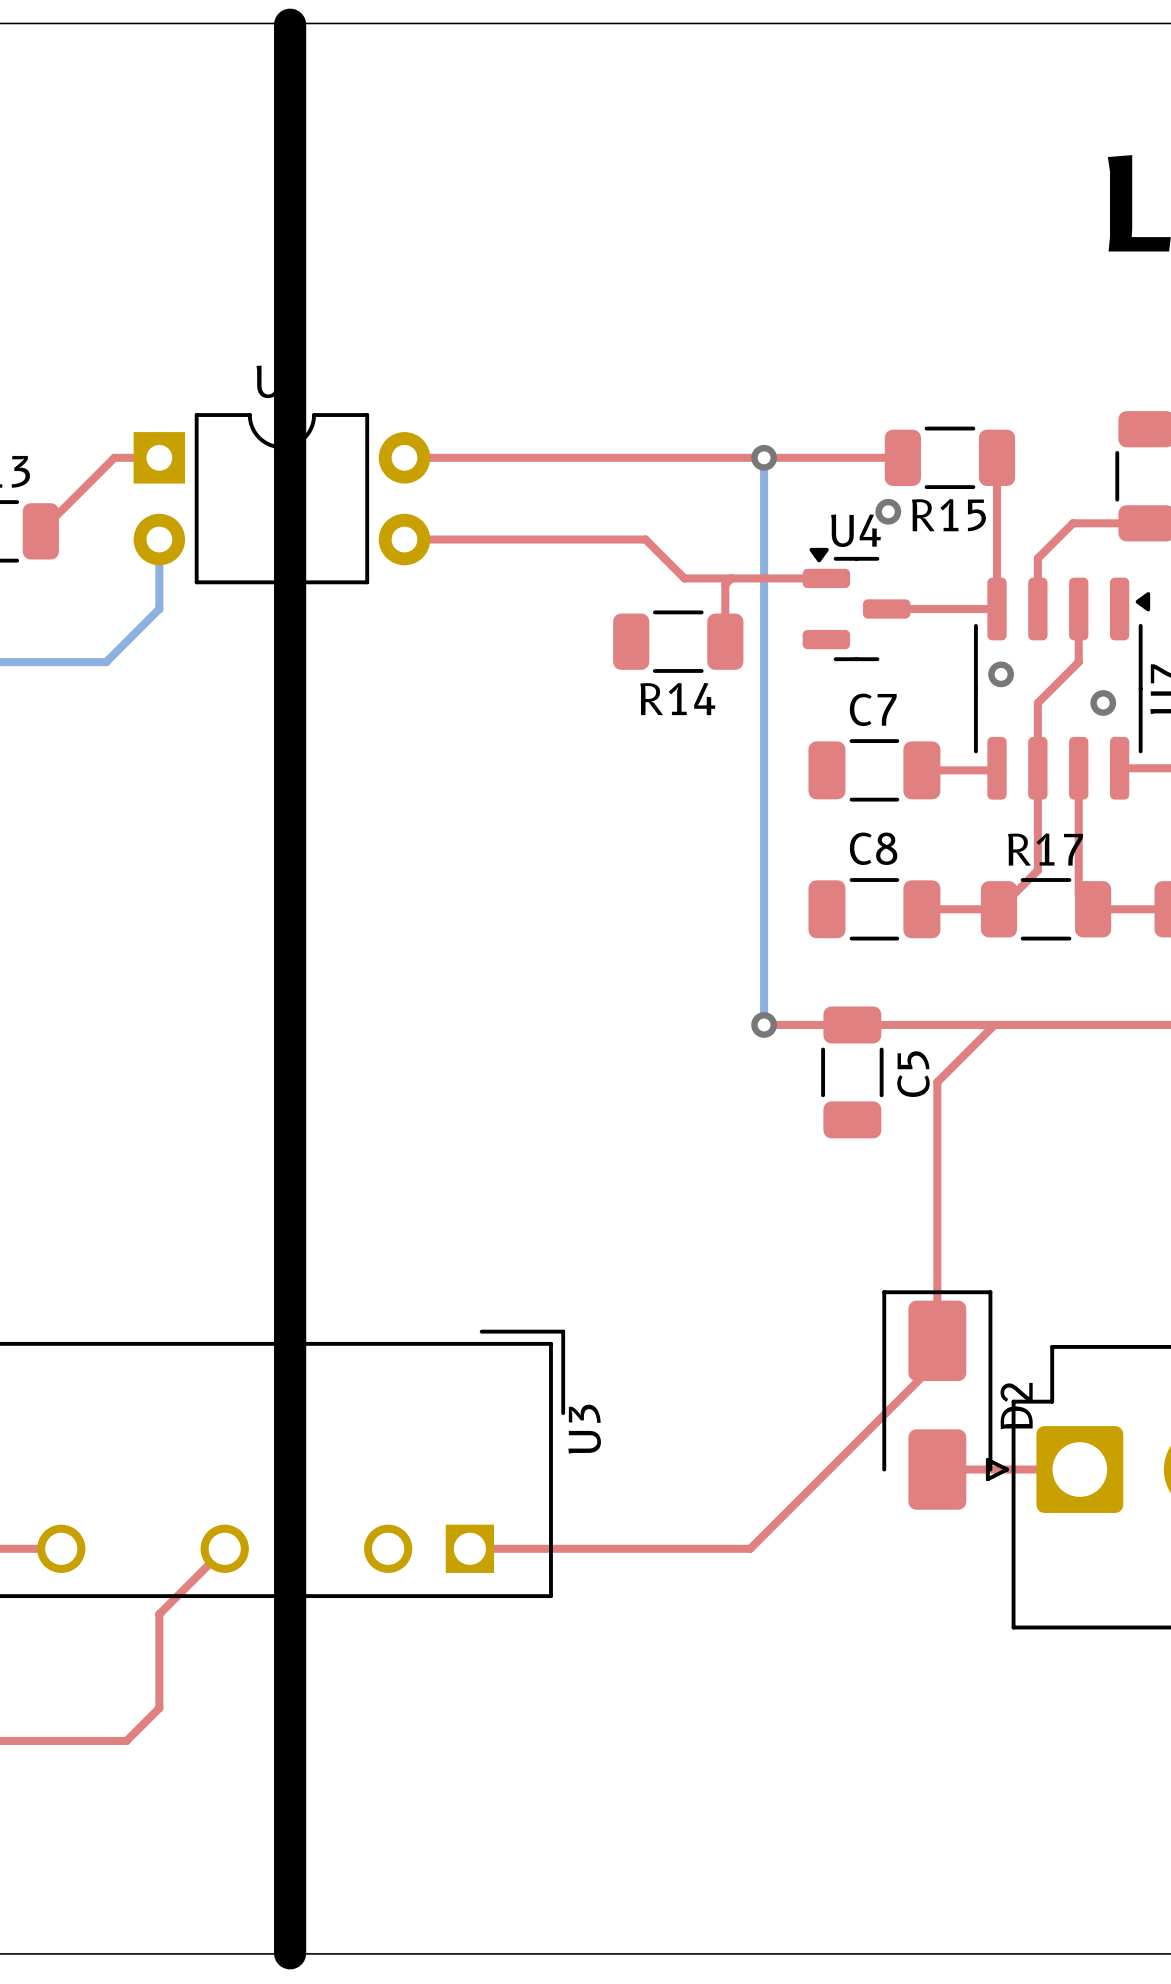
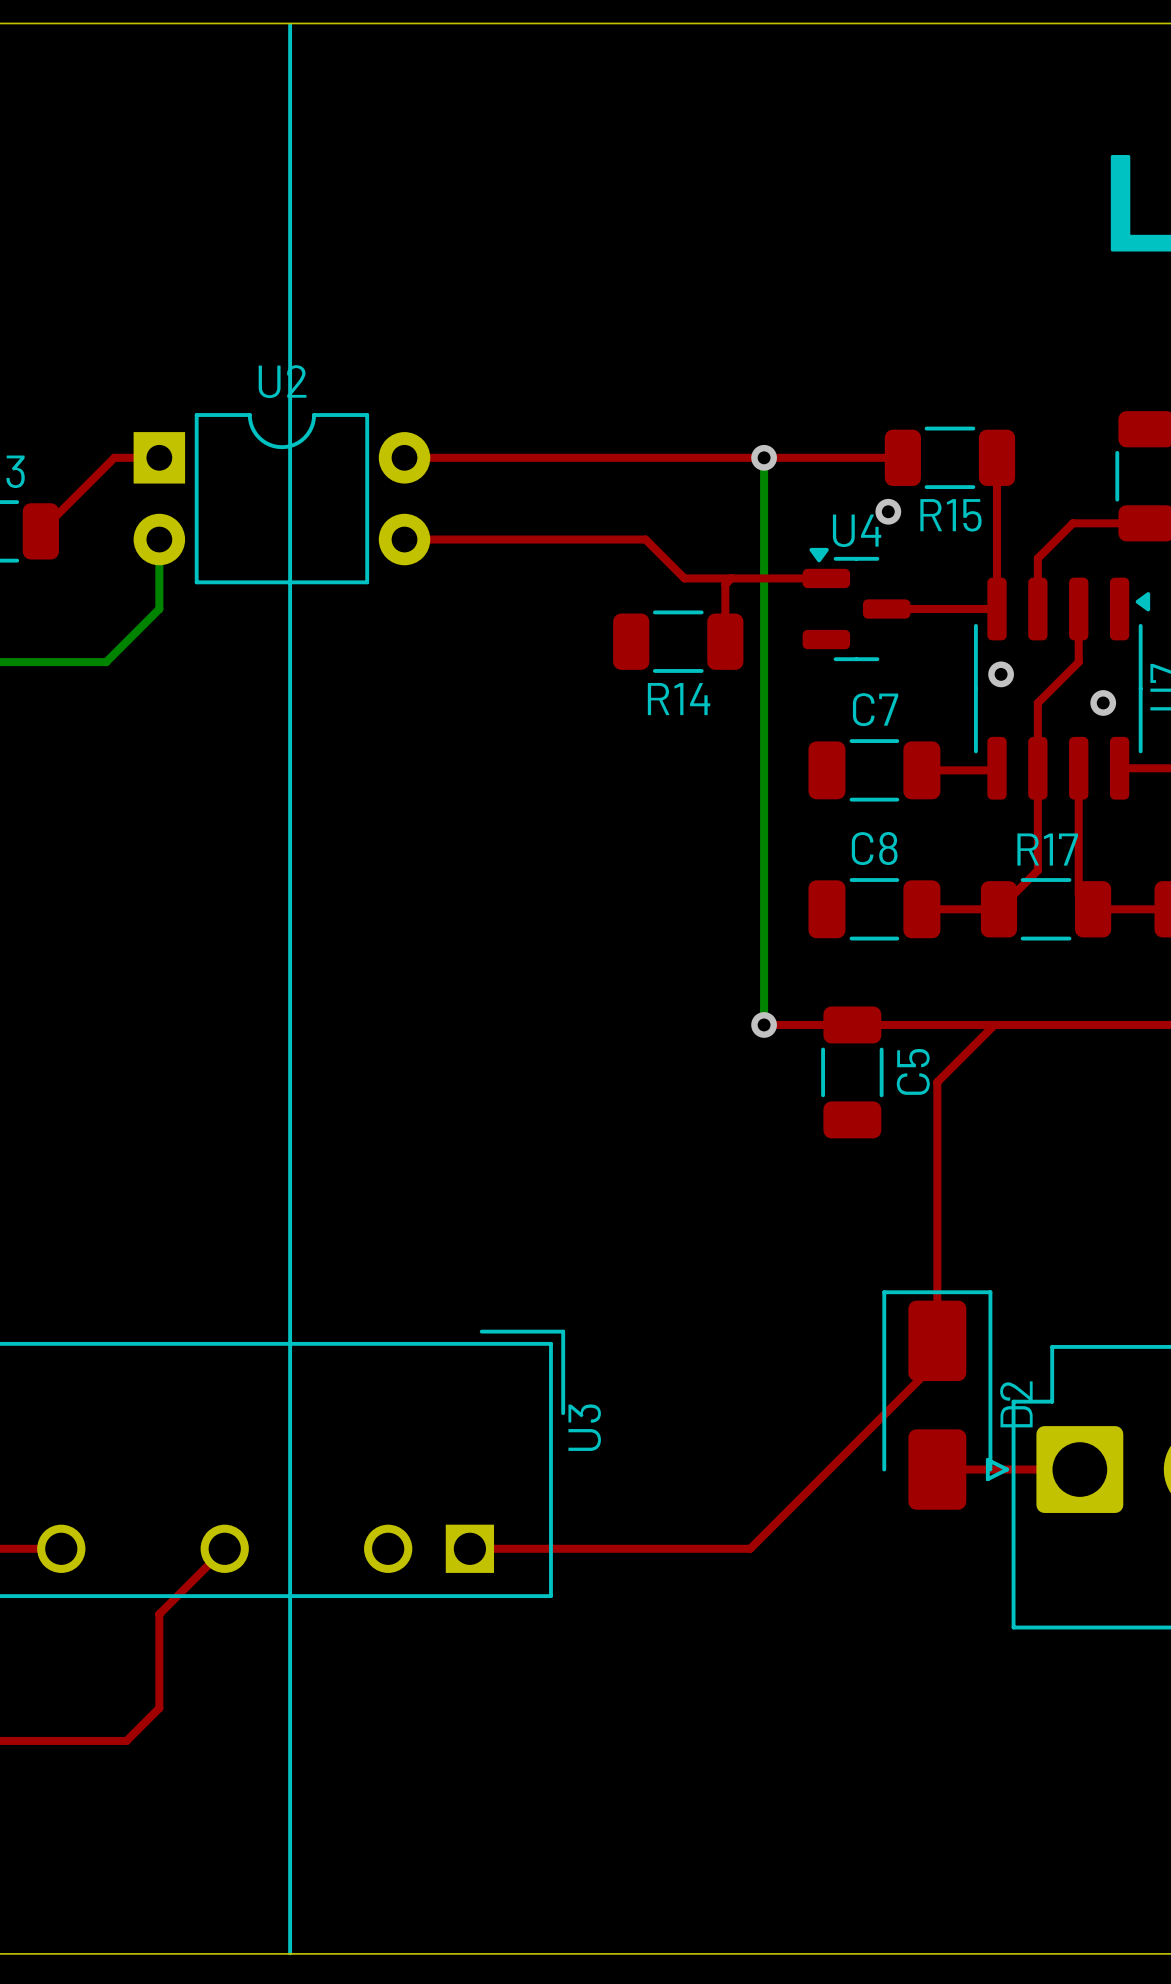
line width: thick (290, 24) (290, 1953) -> thin (290, 24) (290, 1953)

